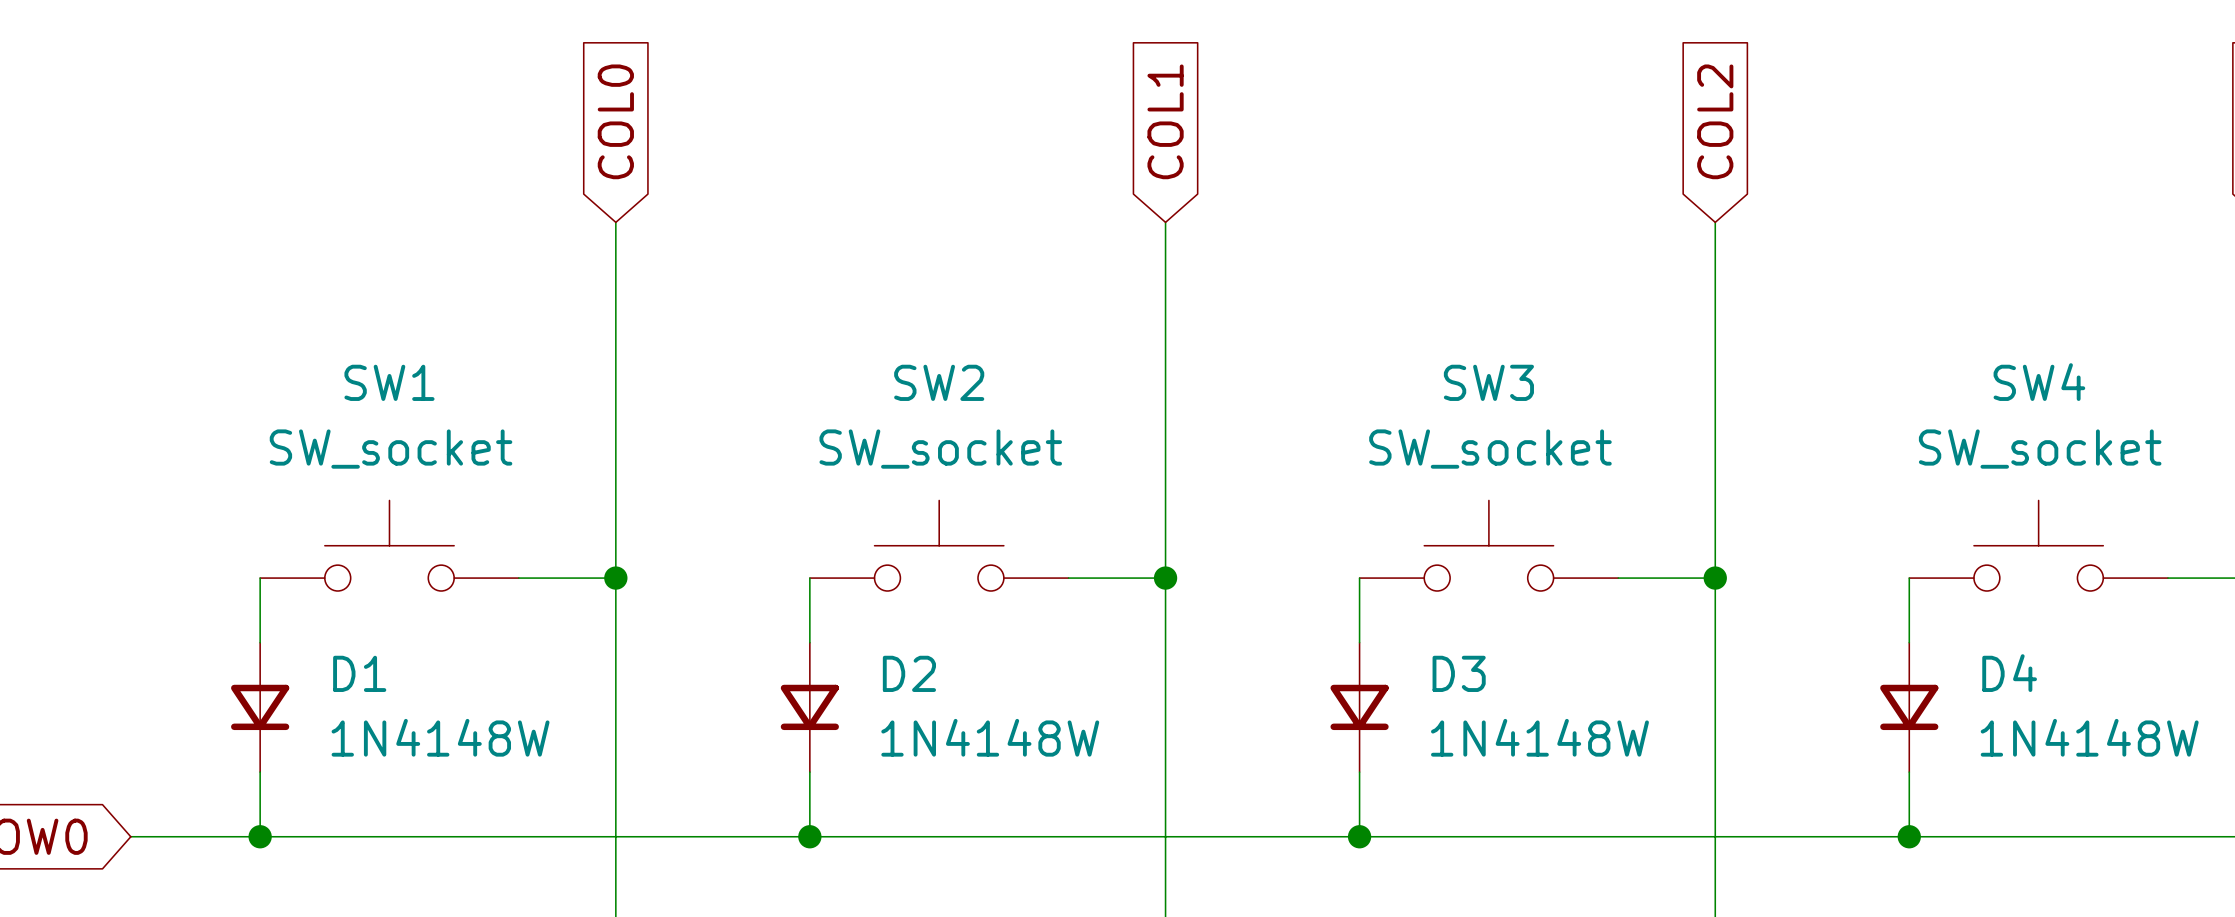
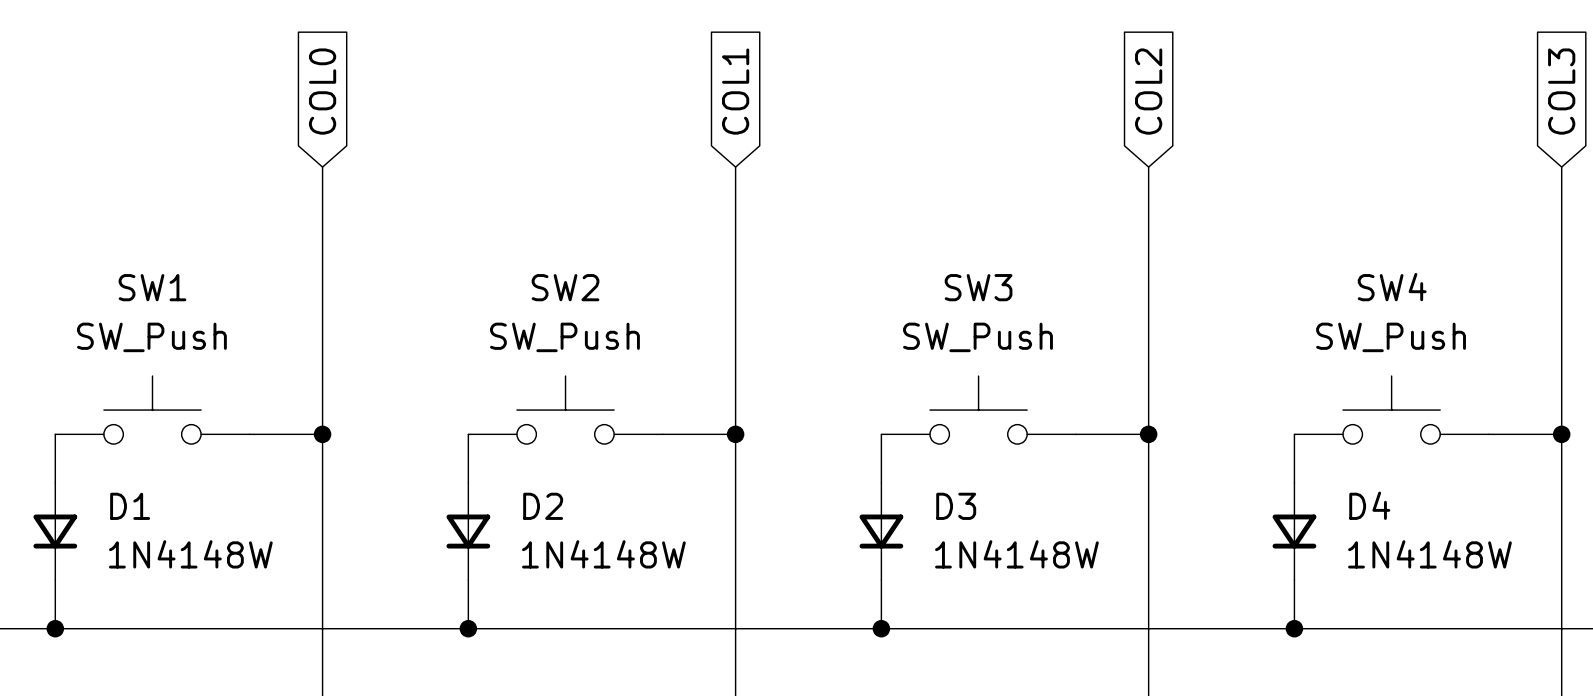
SW1 value: SW_socket (391, 449) -> SW_Push (151, 337)
SW2 value: SW_socket (940, 449) -> SW_Push (564, 337)
SW3 value: SW_socket (1490, 449) -> SW_Push (977, 337)
SW4 value: SW_socket (2040, 449) -> SW_Push (1391, 337)

